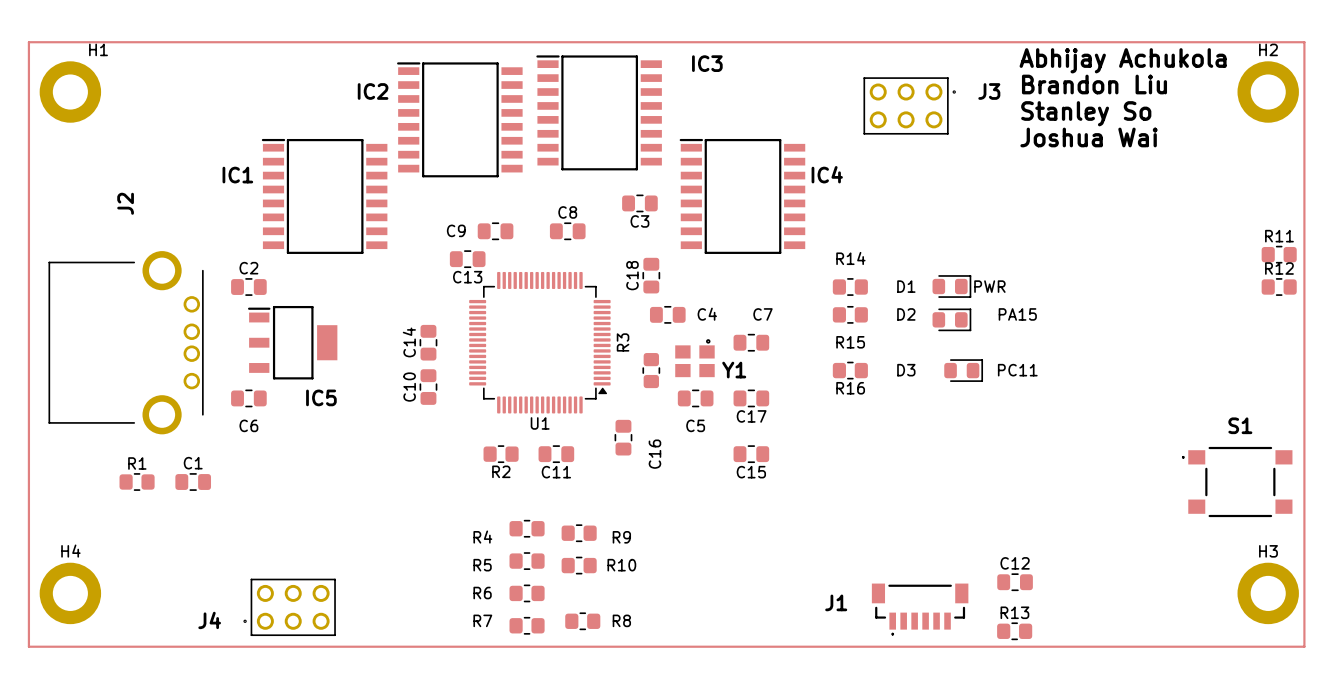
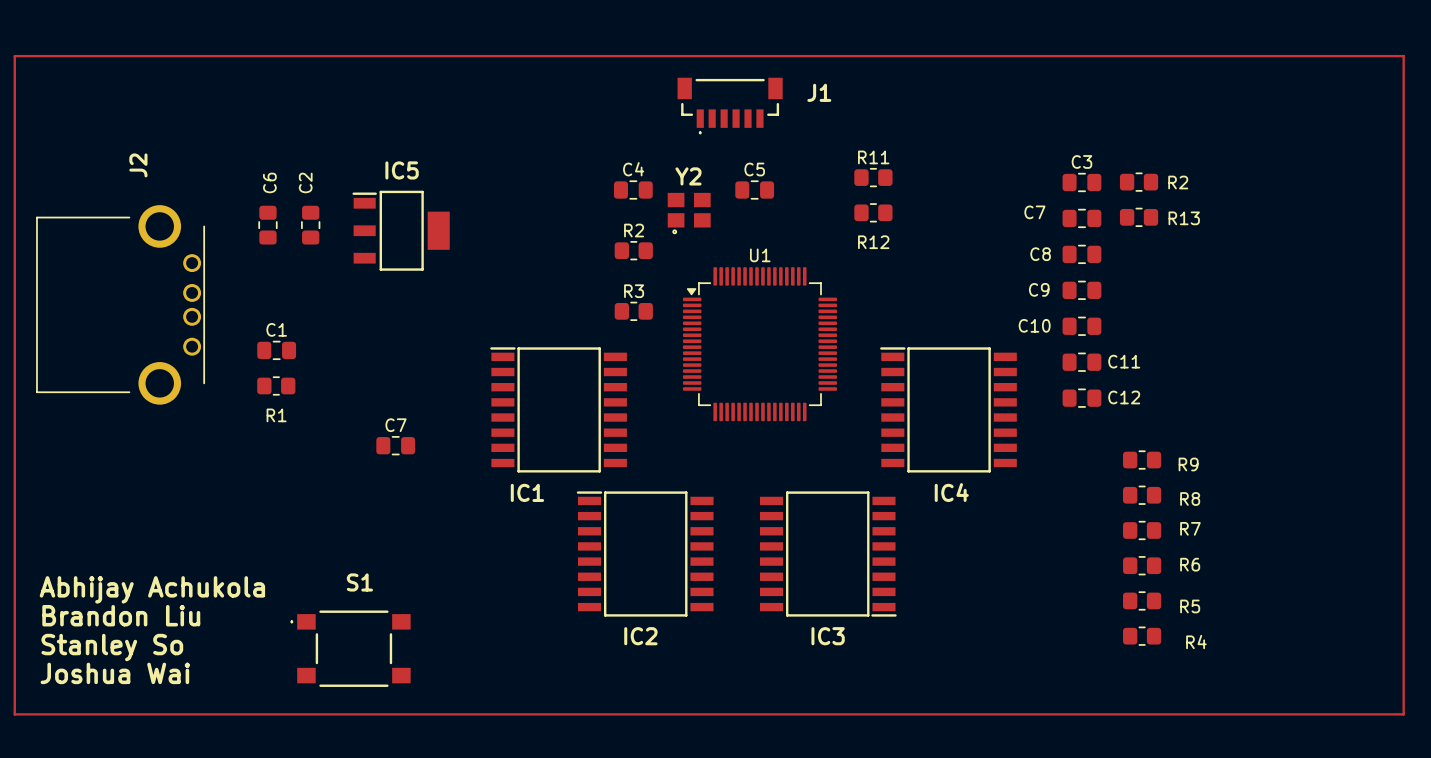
text: Abhijay Achukola (1123, 60) -> none
IC3 name position: IC3 (707, 63) -> IC3 (828, 636)
text: Brandon Liu (1094, 84) -> none
IC2 name position: IC2 (373, 91) -> IC2 (640, 636)
H1: (70, 92) -> none
H2: (1268, 92) -> none
J3: (909, 105) -> none
IC3 rotation: 0° (599, 112) -> 180° (828, 554)
IC3 position: (599, 112) -> (828, 554)
text: Stanley So (1086, 113) -> none
IC2 position: (459, 119) -> (645, 553)
text: Joshua Wai (1089, 137) -> none
R2: none -> (1139, 182)
IC4 name position: IC4 (827, 174) -> IC4 (951, 492)
IC1 name position: IC1 (237, 175) -> IC1 (527, 492)
Y2: none -> (689, 213)
C7: none -> (1081, 218)
IC1 position: (324, 196) -> (558, 409)
IC4 position: (742, 196) -> (948, 409)
J2 name position: J2 (125, 203) -> J2 (138, 165)
C3 position: (639, 203) -> (1081, 182)
C8 name position: C8 (567, 212) -> C8 (1040, 254)
C3 name position: C3 (639, 221) -> C3 (1081, 161)
C9 position: (495, 231) -> (1081, 290)
C8 position: (567, 231) -> (1081, 254)
R11 position: (1279, 254) -> (873, 177)
C13: (467, 259) -> none
R12 name position: R12 (1279, 268) -> R12 (873, 242)
C18: (651, 275) -> none
D1: (951, 286) -> none
text: PWR (989, 286) -> none
C2 rotation: 0° (248, 287) -> 90° clockwise (310, 225)
C2 position: (248, 287) -> (310, 225)
R14: (850, 287) -> none
R12 position: (1279, 287) -> (873, 212)
C4 position: (667, 314) -> (633, 190)
C4 name position: C4 (707, 314) -> C4 (633, 169)
R15: (850, 314) -> none
text: PA15 (1017, 314) -> none
D2: (951, 319) -> none
J2 position: (126, 342) -> (120, 304)
IC5 position: (292, 342) -> (401, 230)
C14: (428, 342) -> none
U1 rotation: 0° (539, 342) -> 180° (759, 344)
U1 position: (539, 342) -> (759, 344)
R3 name position: R3 (623, 342) -> R3 (634, 291)
C7: (751, 342) -> none
Y1: (694, 358) -> none
R3 rotation: 0° (651, 370) -> 90° clockwise (633, 311)
R3 position: (651, 370) -> (633, 311)
R16: (850, 370) -> none
D3: (963, 370) -> none
text: PC11 (1017, 370) -> none
C10 name position: C10 (409, 387) -> C10 (1034, 325)
C10 rotation: 0° (428, 387) -> 90° clockwise (1081, 326)
C10 position: (428, 387) -> (1081, 326)
IC5 name position: IC5 (321, 397) -> IC5 (402, 170)
C6 rotation: 0° (248, 398) -> 90° clockwise (267, 225)
C6 position: (248, 398) -> (267, 225)
C5 position: (695, 398) -> (754, 190)
C17: (751, 398) -> none
C7: none -> (395, 445)
C6 name position: C6 (248, 425) -> C6 (269, 182)
C5 name position: C5 (695, 425) -> C5 (754, 169)
S1 name position: S1 (1240, 425) -> S1 (359, 582)
C16: (623, 437) -> none
R2 position: (501, 454) -> (633, 250)
C11 position: (556, 454) -> (1081, 362)
C15: (751, 454) -> none
R1 name position: R1 (137, 463) -> R1 (276, 415)
R2 name position: R2 (501, 471) -> R2 (634, 230)
C11 name position: C11 (556, 472) -> C11 (1124, 361)
R1 position: (137, 482) -> (276, 385)
C1 position: (193, 482) -> (276, 350)
S1 position: (1237, 482) -> (350, 648)
R4 position: (527, 528) -> (1142, 636)
text: none -> Abhijay Achukola (152, 589)
R9 position: (579, 533) -> (1142, 460)
R4 name position: R4 (482, 537) -> R4 (1196, 642)
text: none -> Brandon Liu (121, 615)
R5 position: (527, 561) -> (1142, 600)
C12 name position: C12 (1015, 563) -> C12 (1124, 397)
R5 name position: R5 (482, 565) -> R5 (1190, 606)
R10: (579, 565) -> none
C12 position: (1015, 582) -> (1081, 398)
text: none -> Stanley So (112, 647)
H4: (70, 593) -> none
R6 name position: R6 (482, 593) -> R6 (1190, 564)
R6 position: (527, 593) -> (1142, 565)
H3: (1268, 593) -> none
J1 name position: J1 (836, 602) -> J1 (819, 92)
J4: (289, 607) -> none
text: none -> Joshua Wai (115, 673)
J1 position: (920, 609) -> (730, 105)
R13 name position: R13 (1014, 612) -> R13 (1184, 218)
R7 name position: R7 (482, 620) -> R7 (1190, 528)
R8 name position: R8 (621, 620) -> R8 (1190, 498)
R8 position: (582, 621) -> (1142, 495)
R7 position: (527, 625) -> (1142, 530)
R13 position: (1014, 631) -> (1139, 217)

